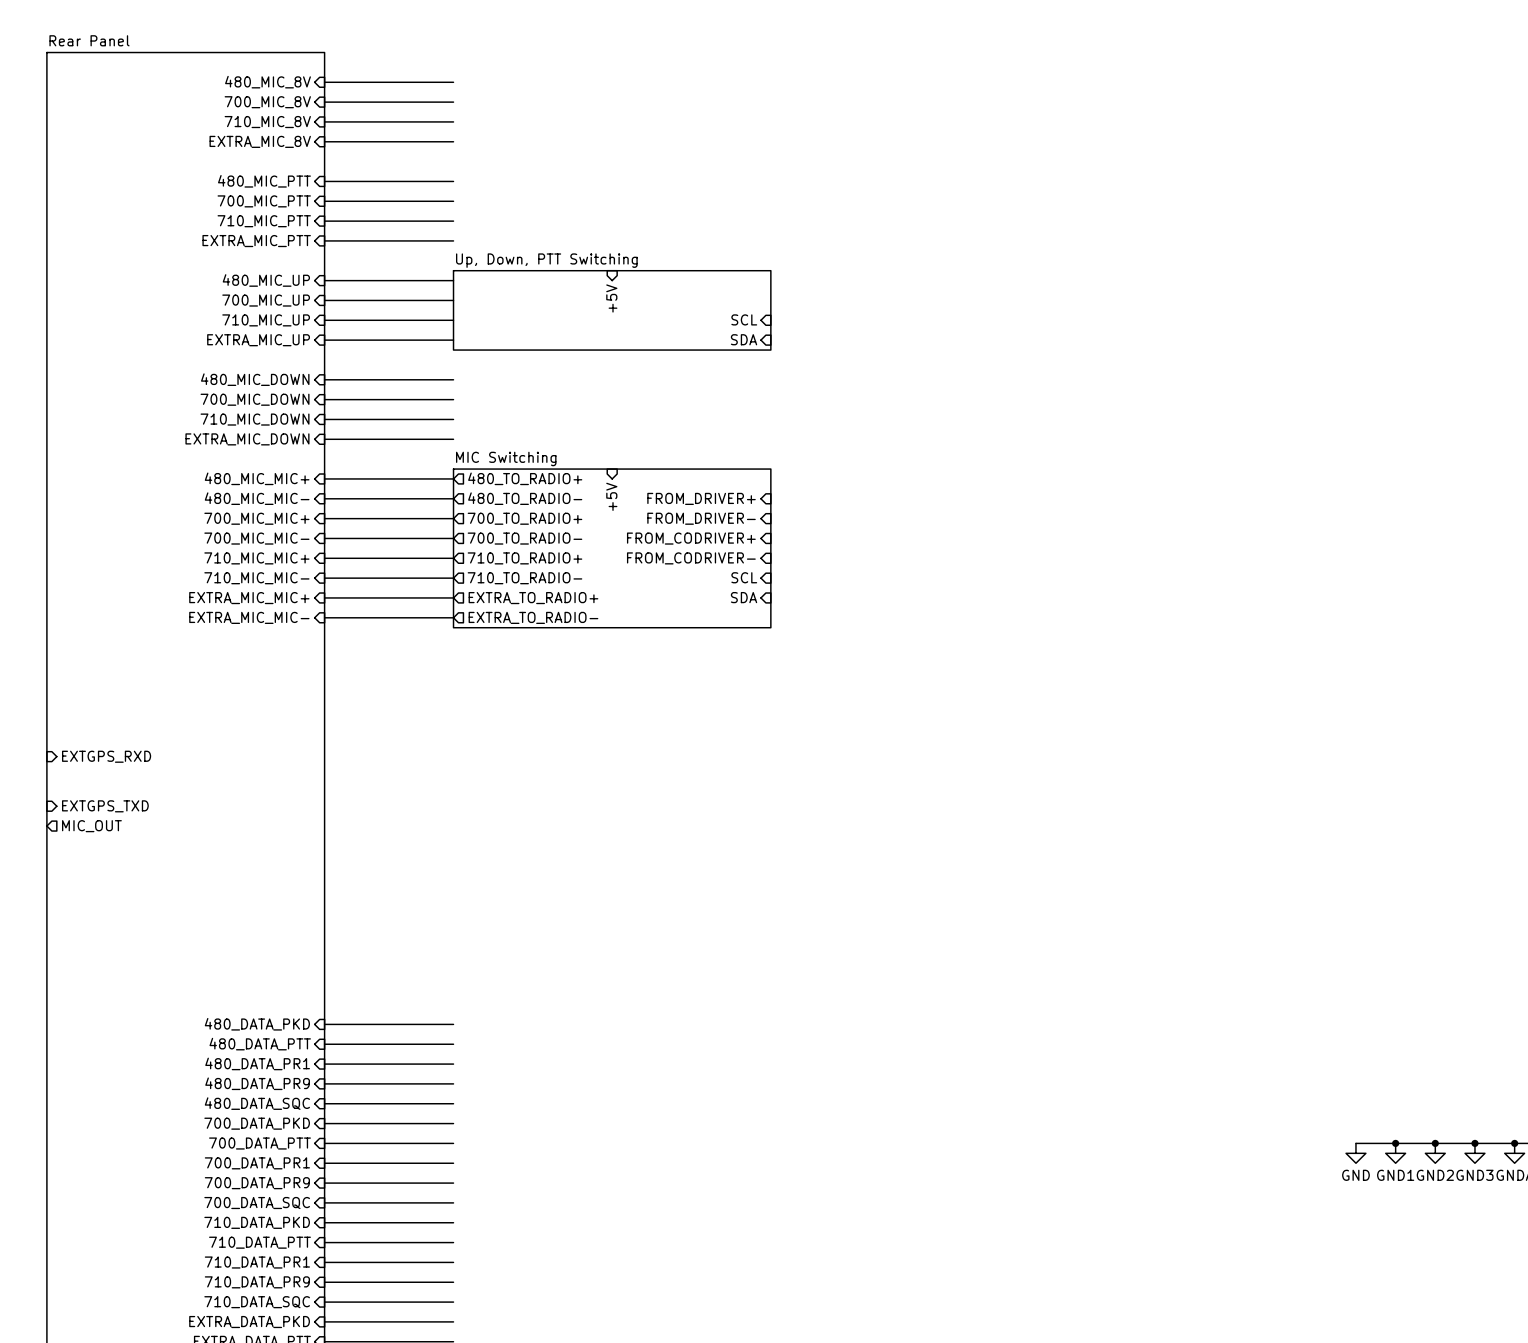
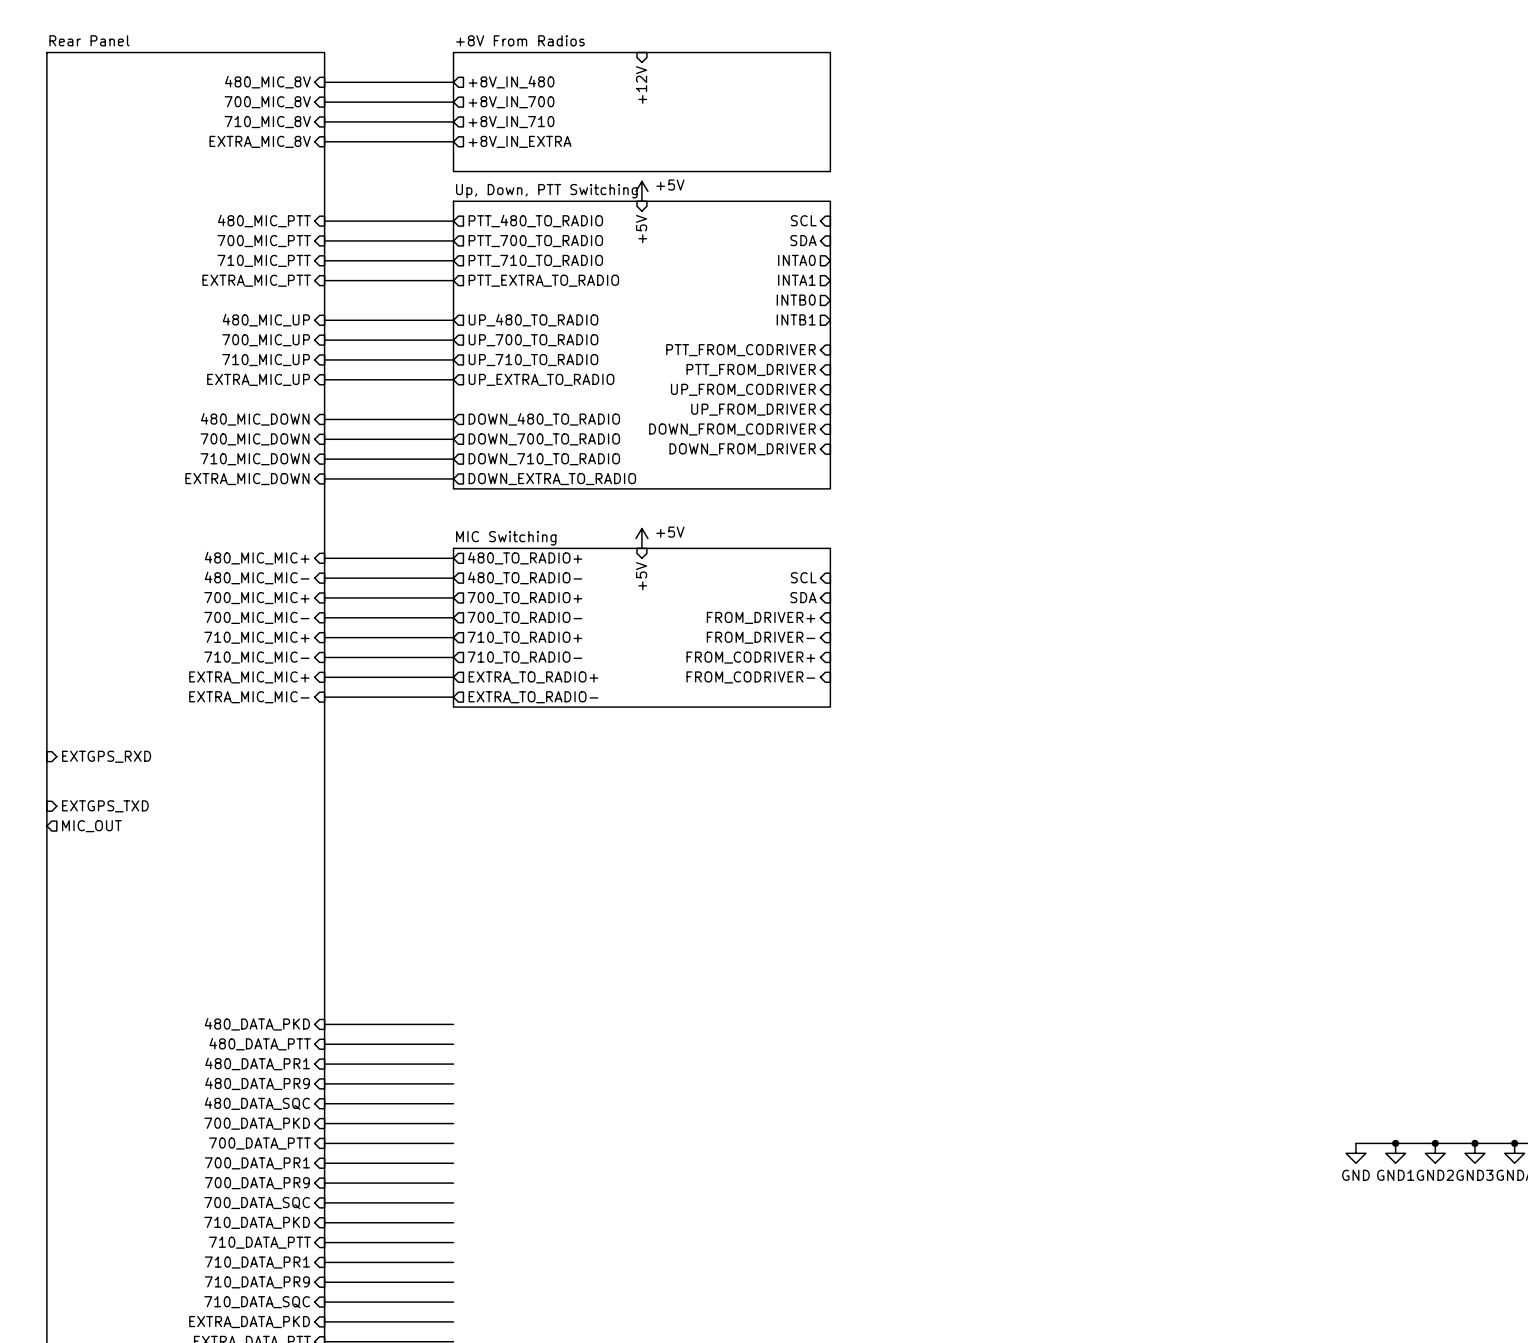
sheet pin: none -> +8V_IN_480 (511, 82)
sheet pin: none -> +12V (641, 85)
sheet pin: none -> +8V_IN_700 (511, 102)
sheet +8V From Radios: none -> (641, 112)
sheet pin: none -> +8V_IN_710 (511, 122)
sheet pin: none -> +8V_IN_EXTRA (520, 141)
sheet pin: 480_MIC_PTT (264, 181) -> none
wire: (324, 181) (453, 181) -> none
power symbol: none -> +5V (641, 191)
sheet pin: 700_MIC_PTT (264, 201) -> none
wire: (324, 201) (453, 201) -> (324, 359) (453, 359)
sheet pin: none -> PTT_480_TO_RADIO (535, 220)
sheet pin: 710_MIC_PTT (264, 221) -> 480_MIC_PTT (264, 220)
sheet pin: EXTRA_MIC_PTT (256, 241) -> 700_MIC_PTT (264, 241)
sheet pin: none -> PTT_700_TO_RADIO (535, 241)
sheet pin: none -> 710_MIC_PTT (264, 260)
sheet pin: none -> PTT_710_TO_RADIO (535, 260)
sheet pin: none -> INTA0 (796, 260)
sheet pin: 480_MIC_UP (266, 280) -> EXTRA_MIC_PTT (256, 280)
sheet pin: none -> PTT_EXTRA_TO_RADIO (543, 280)
sheet pin: none -> INTA1 (796, 280)
sheet pin position: +5V (611, 298) -> +5V (641, 229)
sheet pin: 700_MIC_UP (266, 300) -> none
wire: (324, 300) (453, 300) -> (324, 459) (453, 459)
sheet pin: none -> INTB0 (796, 300)
sheet Up, Down, PTT Switching: (612, 310) -> none
sheet pin position: SCL (744, 319) -> SCL (803, 220)
sheet pin: none -> INTB1 (796, 319)
sheet pin: 710_MIC_UP (266, 320) -> 480_MIC_UP (266, 320)
sheet pin: none -> UP_480_TO_RADIO (533, 320)
sheet pin position: SDA (744, 339) -> SDA (803, 240)
sheet pin: EXTRA_MIC_UP (258, 340) -> 700_MIC_UP (266, 340)
sheet pin: none -> UP_700_TO_RADIO (533, 340)
sheet Up, Down, PTT Switching: none -> (641, 345)
sheet pin: none -> PTT_FROM_CODRIVER (740, 350)
sheet pin: none -> 710_MIC_UP (266, 360)
sheet pin: none -> UP_710_TO_RADIO (533, 360)
sheet pin: none -> PTT_FROM_DRIVER (751, 369)
sheet pin: 480_MIC_DOWN (255, 379) -> EXTRA_MIC_UP (258, 379)
sheet pin: none -> UP_EXTRA_TO_RADIO (541, 379)
sheet pin: none -> UP_FROM_CODRIVER (743, 389)
sheet pin: 700_MIC_DOWN (255, 399) -> none
wire: (324, 399) (453, 399) -> (324, 260) (453, 260)
sheet pin: none -> UP_FROM_DRIVER (753, 409)
sheet pin: 710_MIC_DOWN (255, 419) -> 480_MIC_DOWN (255, 419)
sheet pin: none -> DOWN_480_TO_RADIO (544, 419)
sheet pin: none -> DOWN_FROM_CODRIVER (732, 429)
sheet pin: EXTRA_MIC_DOWN (247, 439) -> 700_MIC_DOWN (255, 439)
sheet pin: none -> DOWN_700_TO_RADIO (544, 439)
sheet pin: none -> DOWN_FROM_DRIVER (742, 449)
sheet pin: none -> 710_MIC_DOWN (255, 459)
sheet pin: none -> DOWN_710_TO_RADIO (544, 459)
sheet pin: 480_MIC_MIC+ (257, 478) -> EXTRA_MIC_DOWN (247, 479)
sheet pin: 480_TO_RADIO+ (525, 478) -> DOWN_EXTRA_TO_RADIO (552, 479)
sheet pin position: +5V (611, 496) -> +5V (641, 576)
sheet pin: 480_MIC_MIC- (257, 498) -> none
wire: (324, 498) (453, 498) -> (324, 657) (453, 657)
sheet pin: 480_TO_RADIO- (525, 498) -> none
sheet pin position: FROM_DRIVER+ (701, 498) -> FROM_DRIVER+ (761, 617)
sheet pin: 700_MIC_MIC+ (256, 518) -> none
wire: (324, 518) (453, 518) -> (324, 677) (453, 677)
sheet pin: 700_TO_RADIO+ (524, 518) -> none
sheet pin position: FROM_DRIVER- (701, 518) -> FROM_DRIVER- (761, 637)
sheet pin: 700_MIC_MIC- (256, 538) -> none
wire: (324, 538) (453, 538) -> (324, 697) (453, 697)
sheet pin: 700_TO_RADIO- (524, 538) -> none
power symbol: none -> +5V (641, 538)
sheet pin position: FROM_CODRIVER+ (691, 538) -> FROM_CODRIVER+ (750, 657)
sheet MIC Switching: (612, 548) -> none
sheet pin: 710_MIC_MIC+ (256, 558) -> 480_MIC_MIC+ (257, 558)
sheet pin: 710_TO_RADIO+ (524, 558) -> 480_TO_RADIO+ (525, 558)
sheet pin position: FROM_CODRIVER- (691, 558) -> FROM_CODRIVER- (750, 677)
sheet pin position: SCL (744, 577) -> SCL (803, 577)
sheet pin: 710_MIC_MIC- (256, 578) -> 480_MIC_MIC- (257, 578)
sheet pin: 710_TO_RADIO- (524, 578) -> 480_TO_RADIO- (525, 578)
sheet pin position: SDA (744, 597) -> SDA (803, 597)
sheet pin: EXTRA_MIC_MIC+ (249, 598) -> 700_MIC_MIC+ (256, 598)
sheet pin: EXTRA_TO_RADIO+ (533, 598) -> 700_TO_RADIO+ (524, 598)
sheet pin: EXTRA_MIC_MIC- (249, 617) -> 700_MIC_MIC- (256, 617)
sheet pin: EXTRA_TO_RADIO- (533, 617) -> 700_TO_RADIO- (524, 617)
sheet MIC Switching: none -> (641, 627)
sheet pin: none -> 710_MIC_MIC+ (256, 637)
wire: none -> (324, 637) (453, 637)
sheet pin: none -> 710_TO_RADIO+ (524, 637)
sheet pin: none -> 710_MIC_MIC- (256, 657)
sheet pin: none -> 710_TO_RADIO- (524, 657)
sheet pin: none -> EXTRA_MIC_MIC+ (249, 677)
sheet pin: none -> EXTRA_TO_RADIO+ (533, 677)
sheet pin: none -> EXTRA_MIC_MIC- (249, 697)
sheet pin: none -> EXTRA_TO_RADIO- (533, 697)

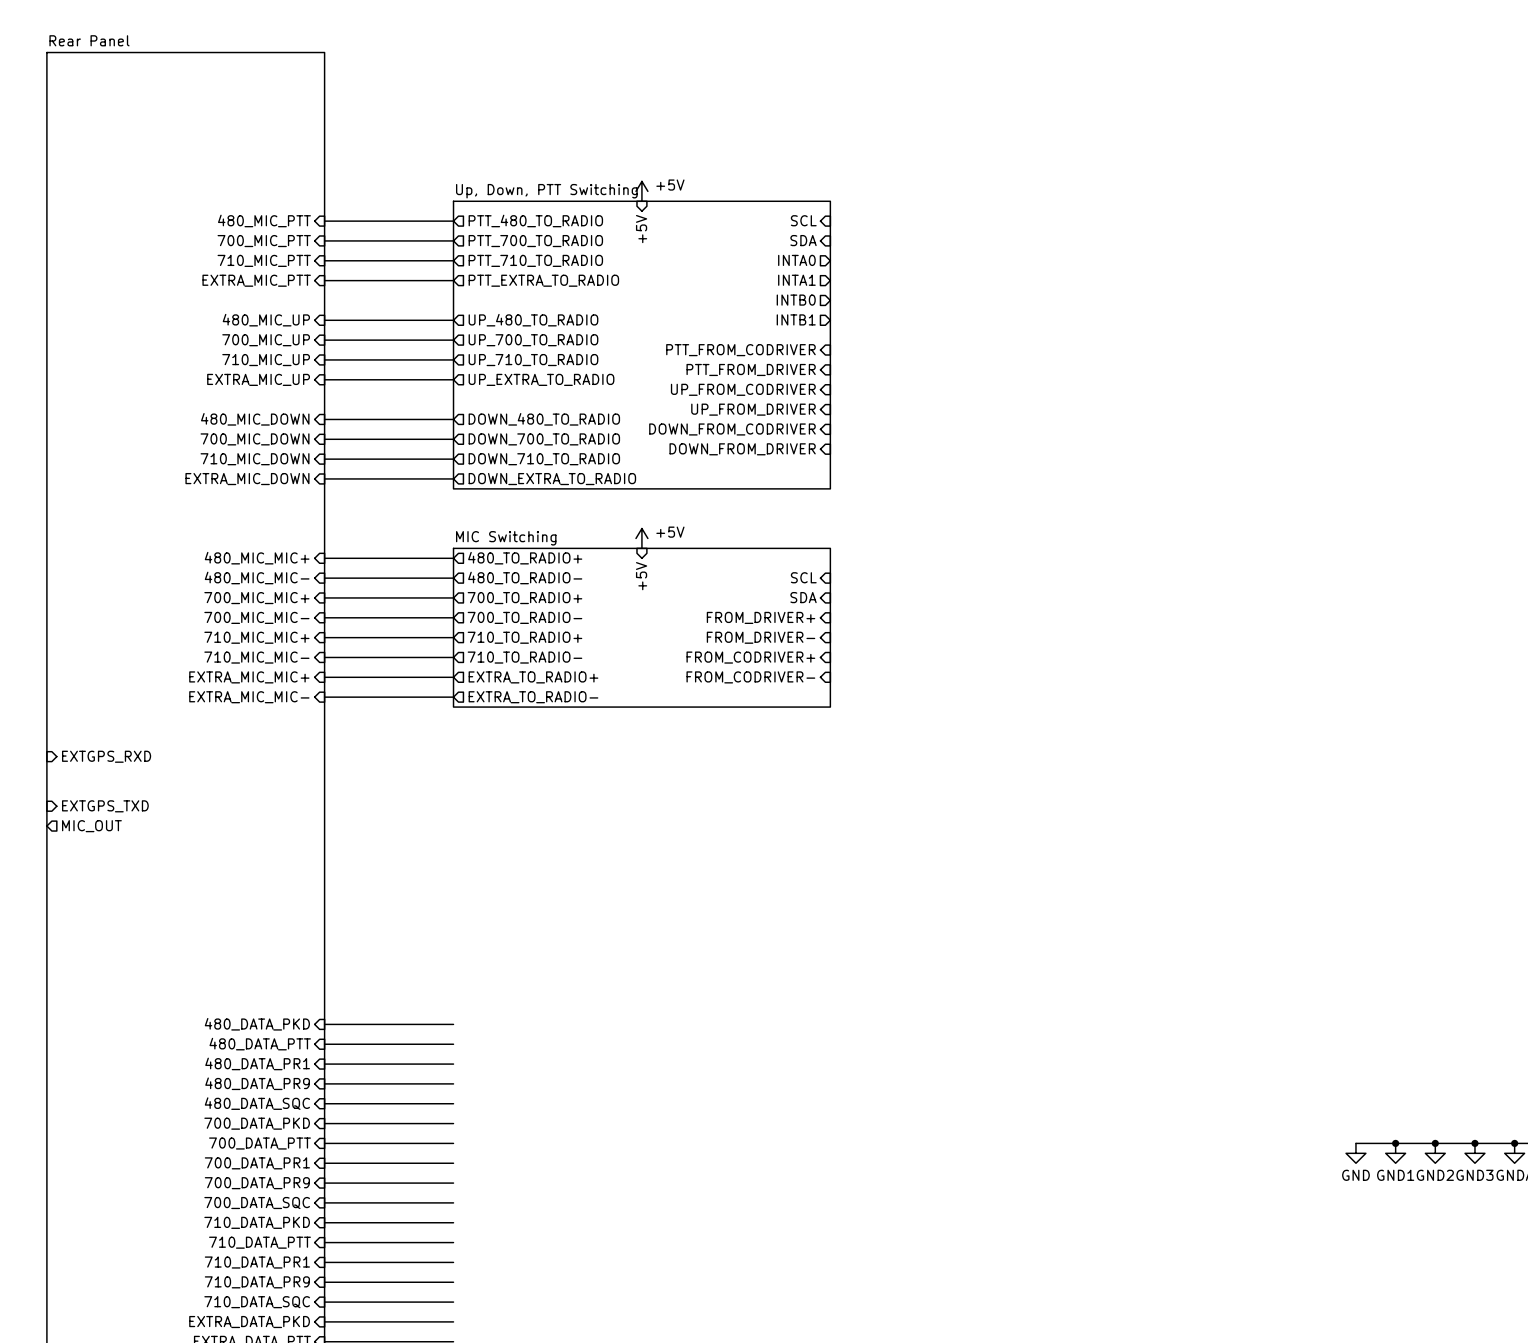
sheet pin: 480_MIC_8V (268, 82) -> none
wire: (324, 82) (453, 82) -> none
sheet pin: +8V_IN_480 (511, 82) -> none
sheet pin: +12V (641, 85) -> none
sheet pin: 700_MIC_8V (267, 102) -> none
wire: (324, 102) (453, 102) -> none
sheet pin: +8V_IN_700 (511, 102) -> none
sheet +8V From Radios: (641, 112) -> none
wire: (324, 121) (453, 121) -> none
sheet pin: 710_MIC_8V (267, 122) -> none
sheet pin: +8V_IN_710 (511, 122) -> none
sheet pin: EXTRA_MIC_8V (260, 141) -> none
wire: (324, 141) (453, 141) -> none
sheet pin: +8V_IN_EXTRA (520, 141) -> none

